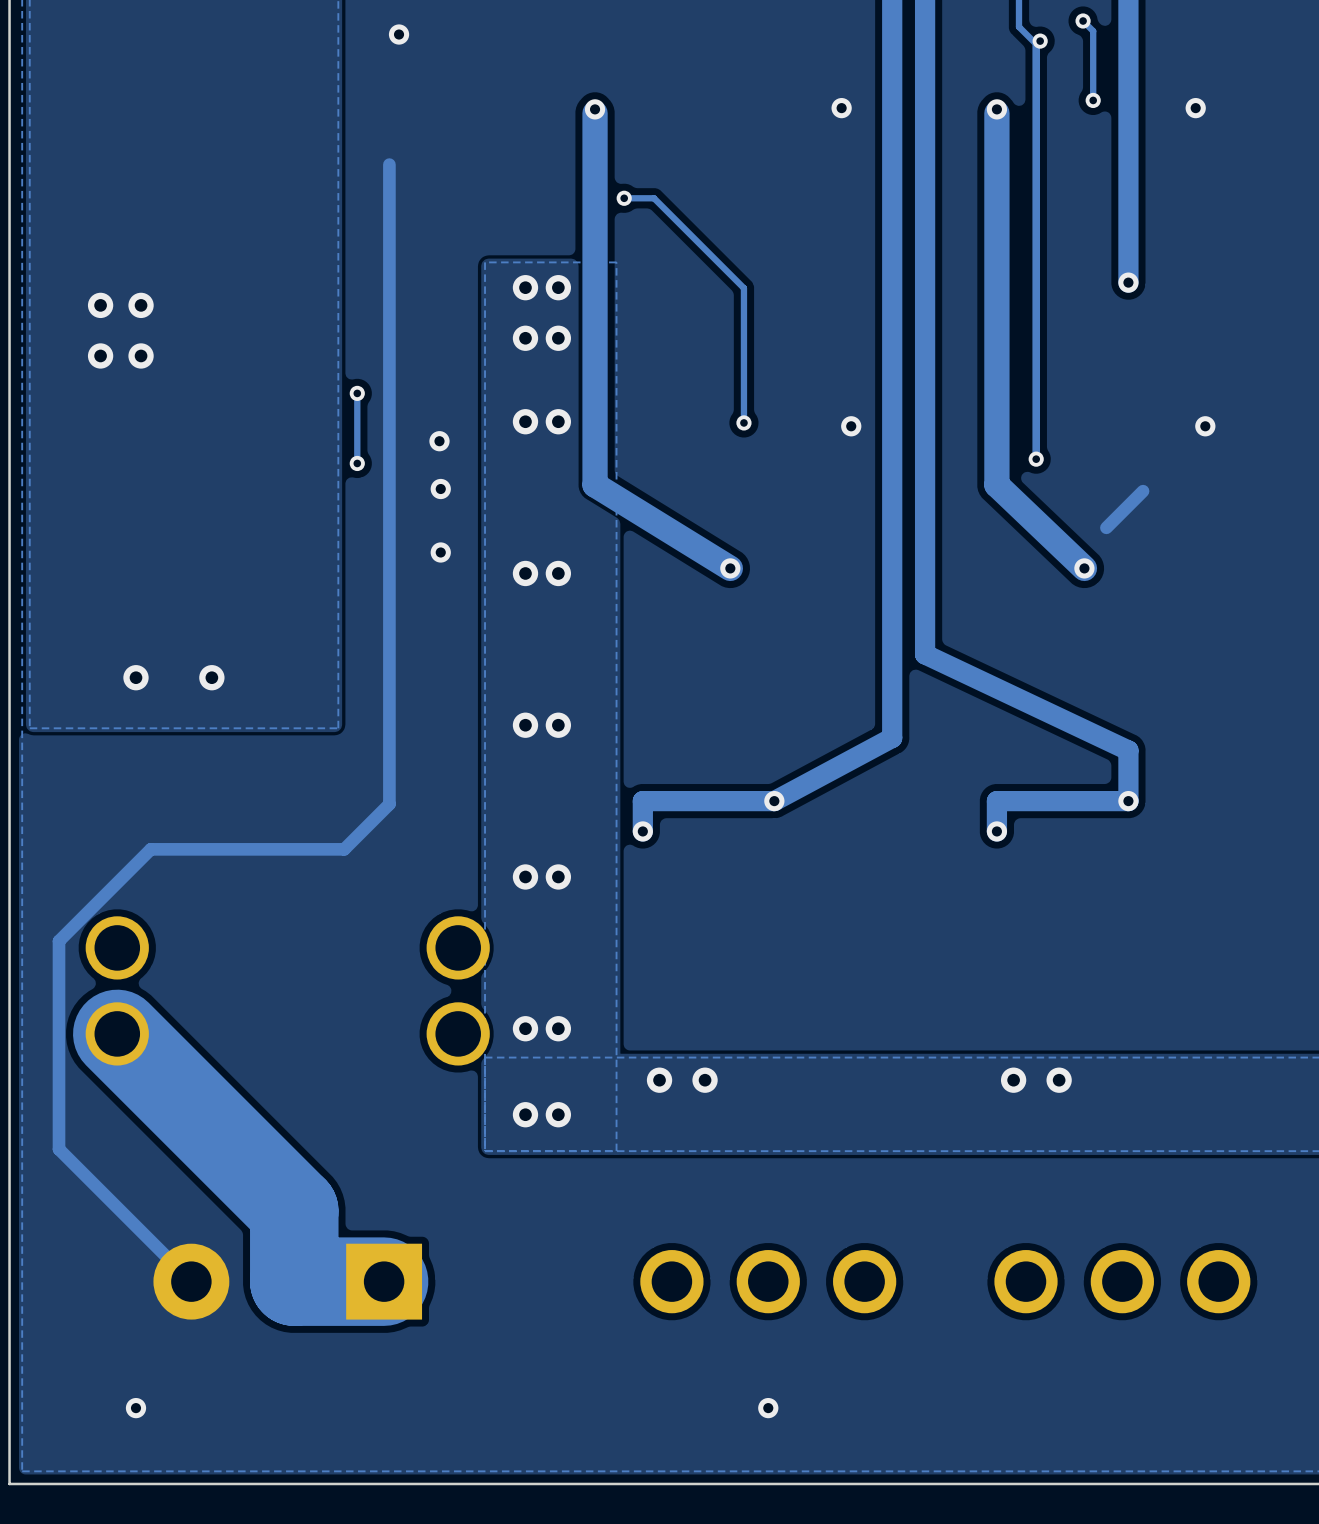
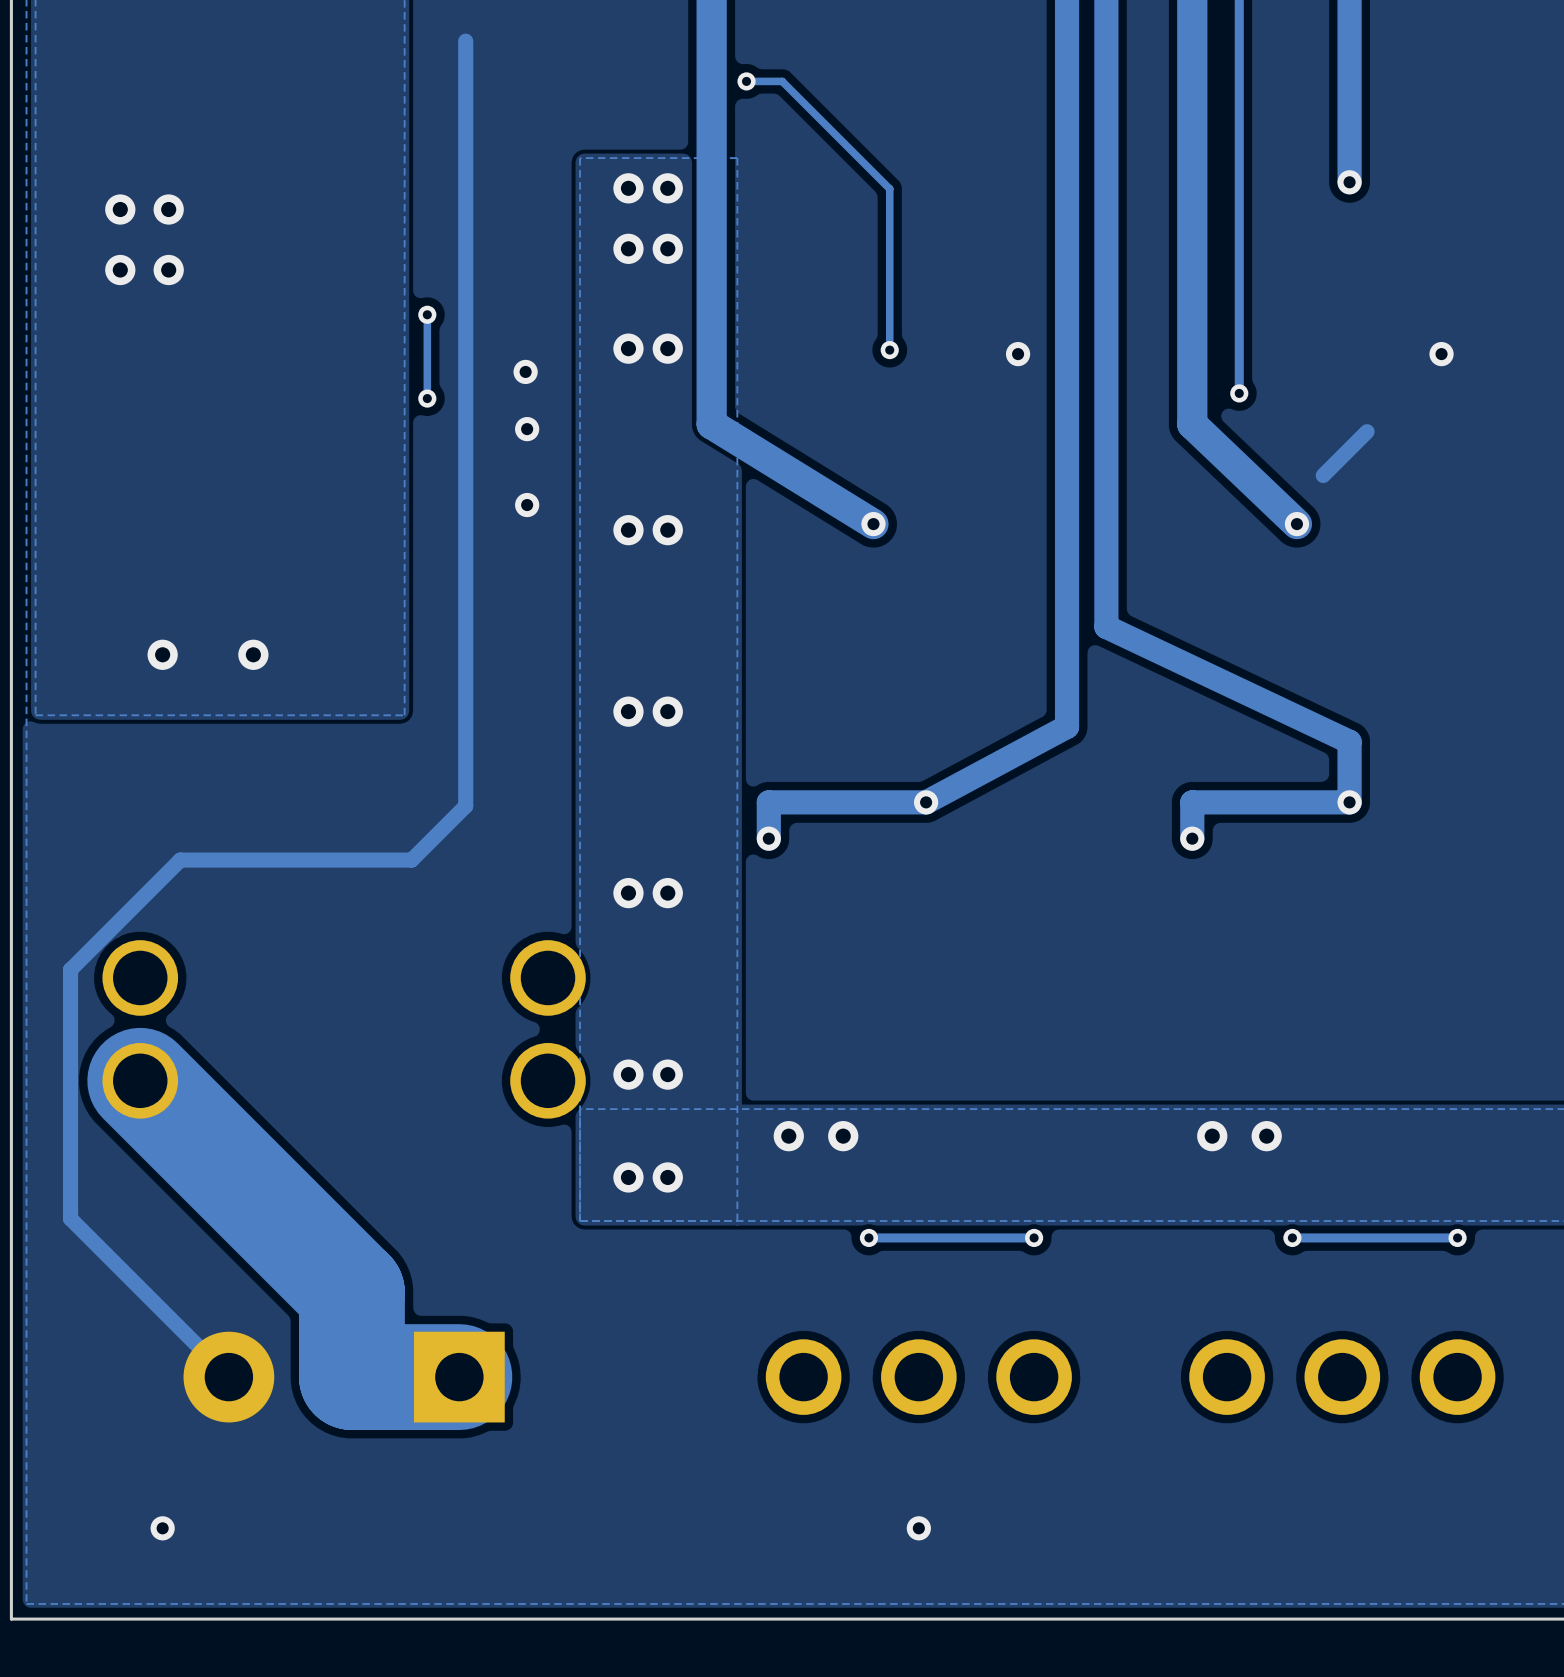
via: none -> (868, 1237)
track: none -> (1034, 1237) (868, 1237)
via: none -> (1034, 1237)
via: none -> (1292, 1237)
track: none -> (1457, 1237) (1292, 1237)
via: none -> (1457, 1237)

